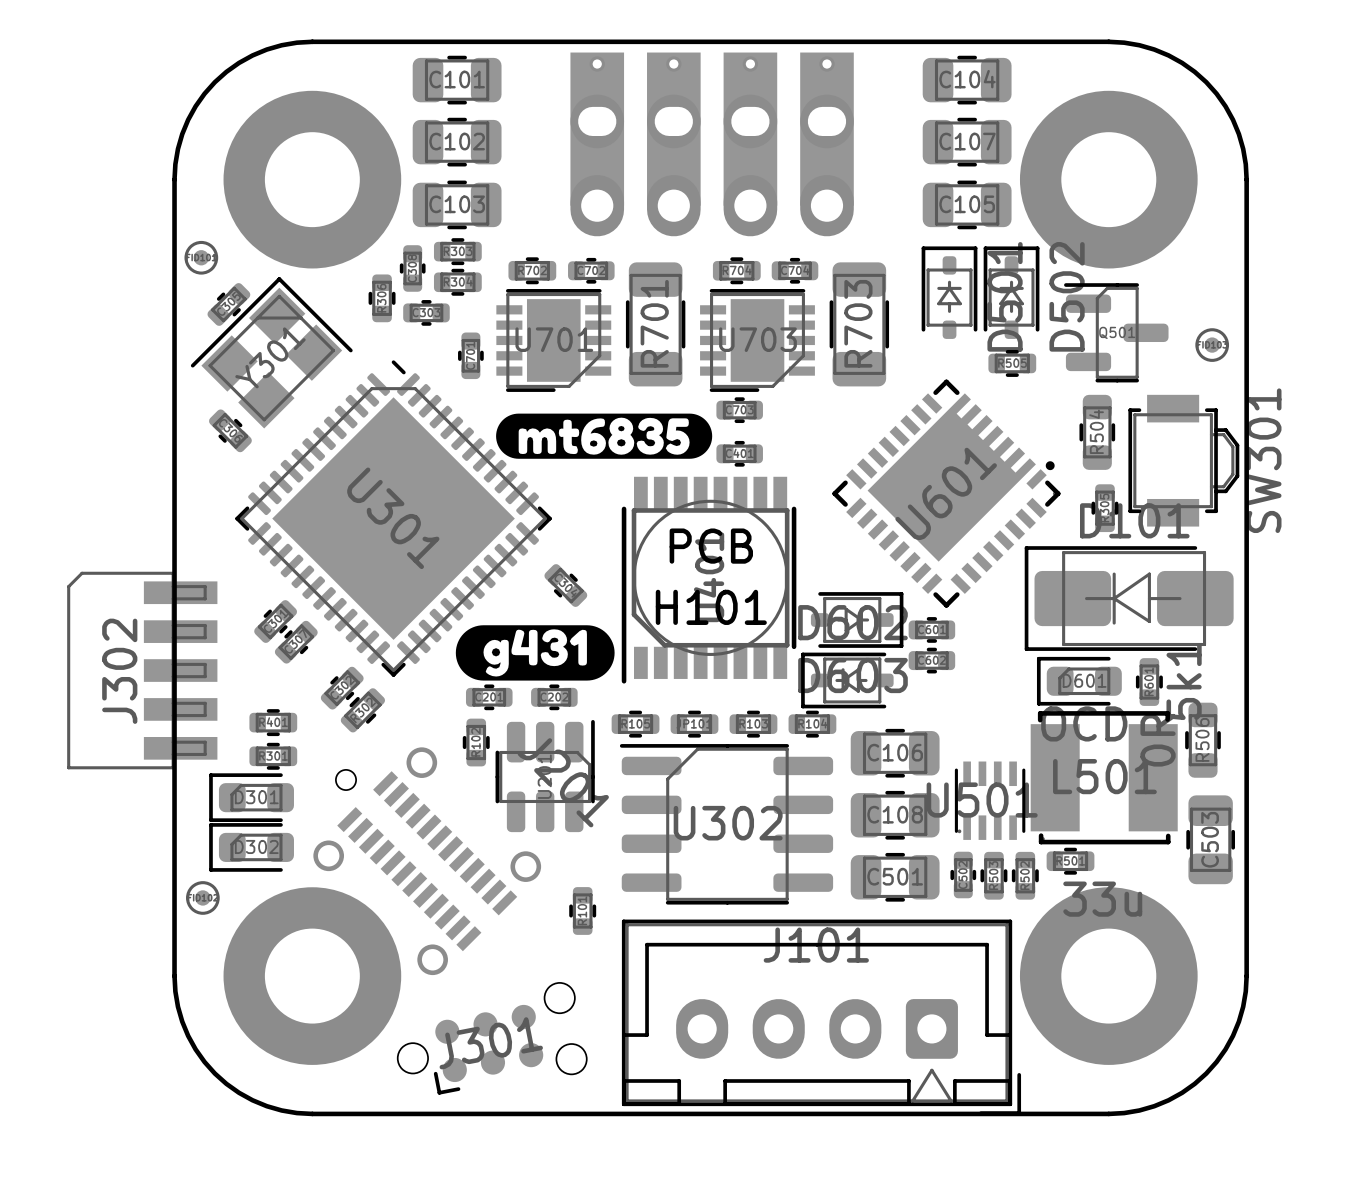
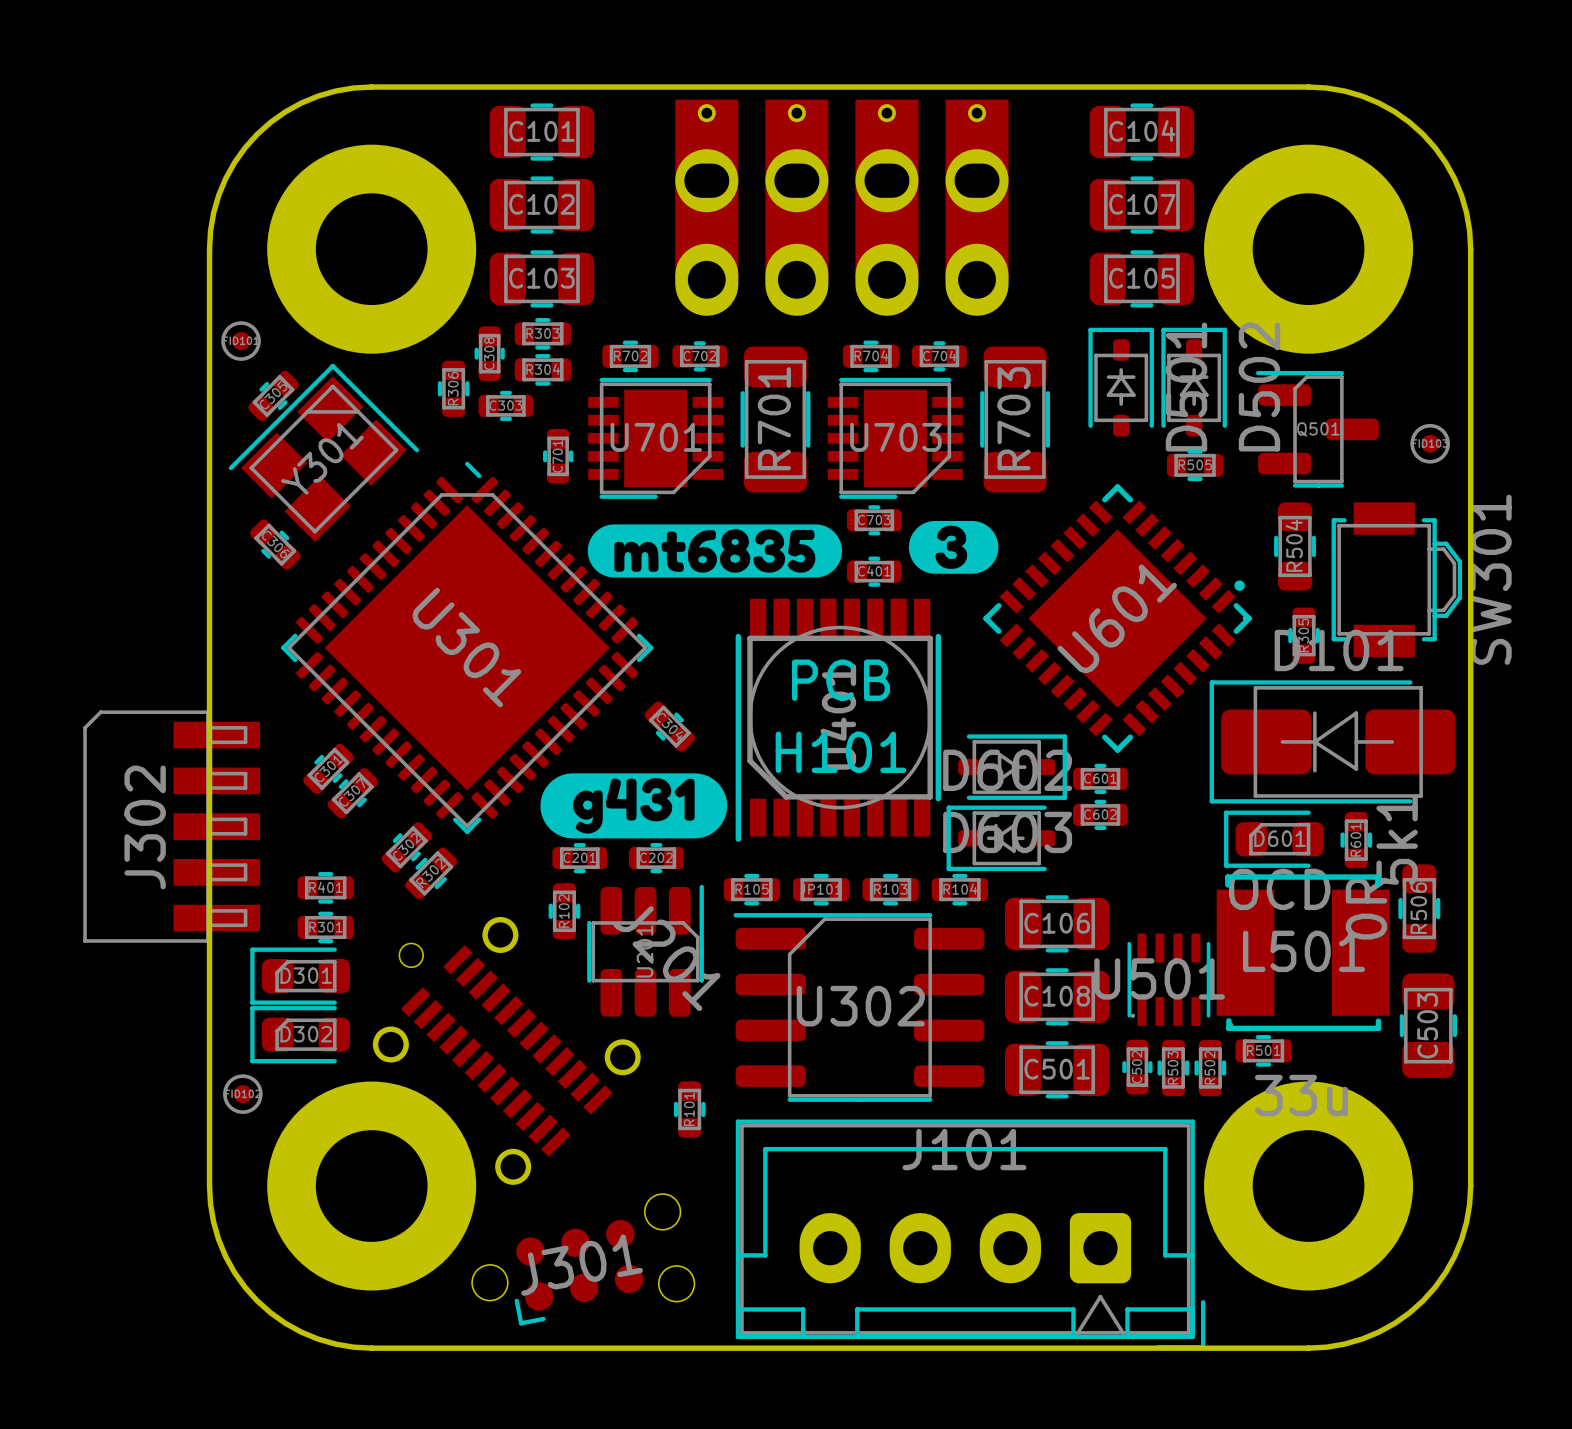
U601 footprint: [832, 379, 1061, 608] -> [983, 484, 1252, 753]
drawing: none -> [908, 520, 999, 574]

